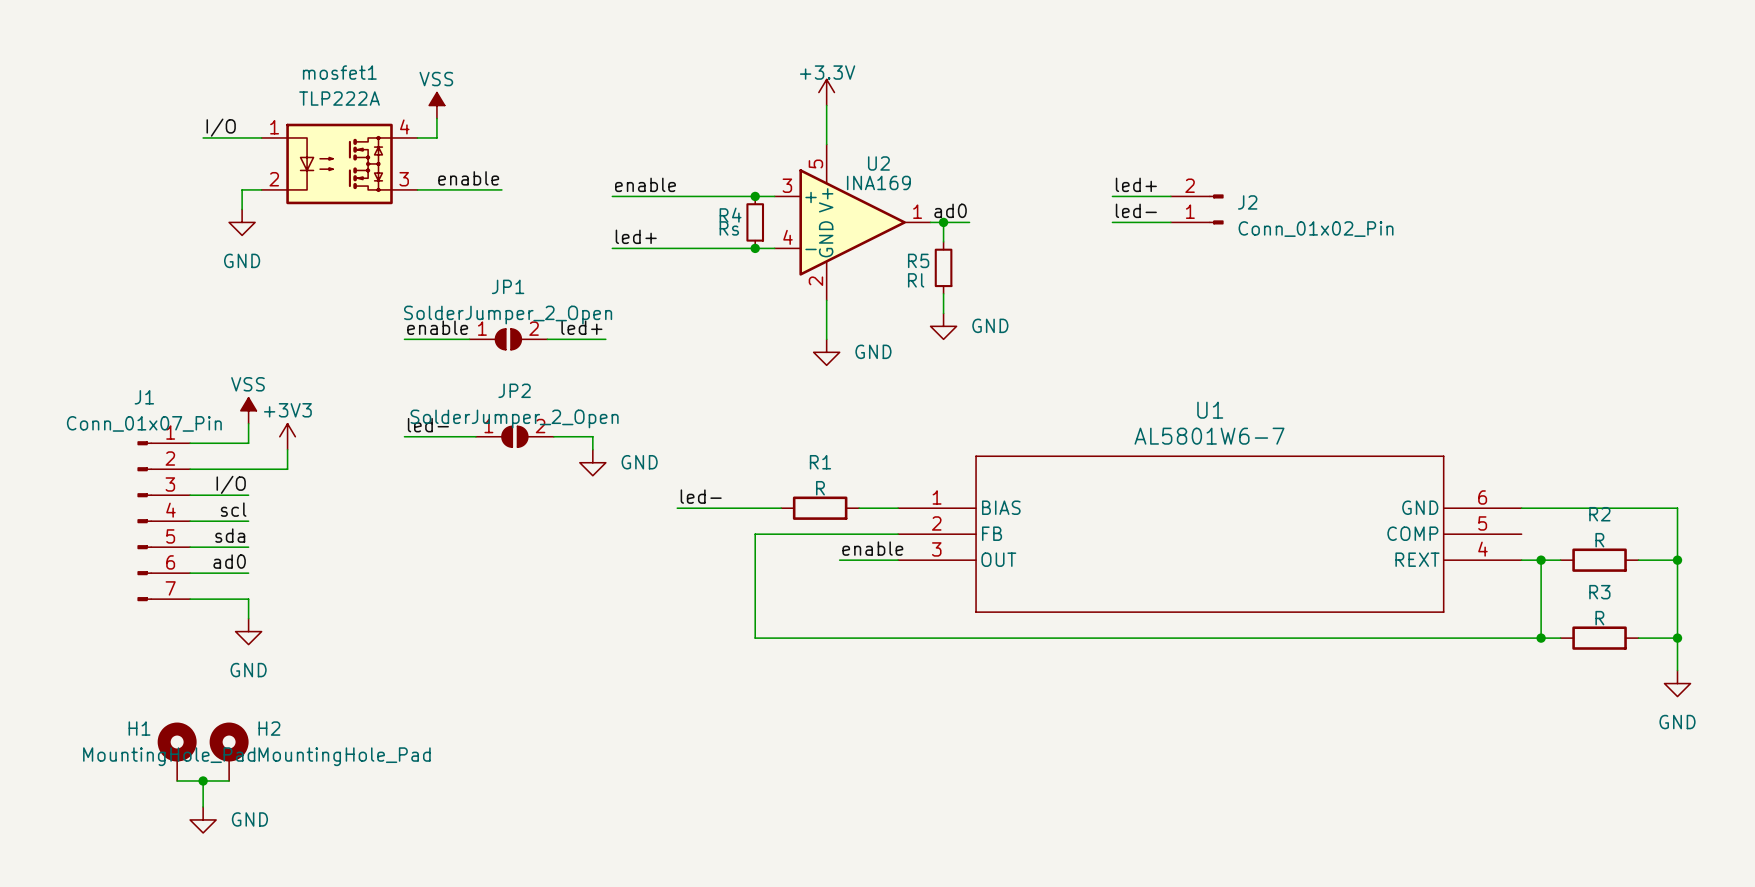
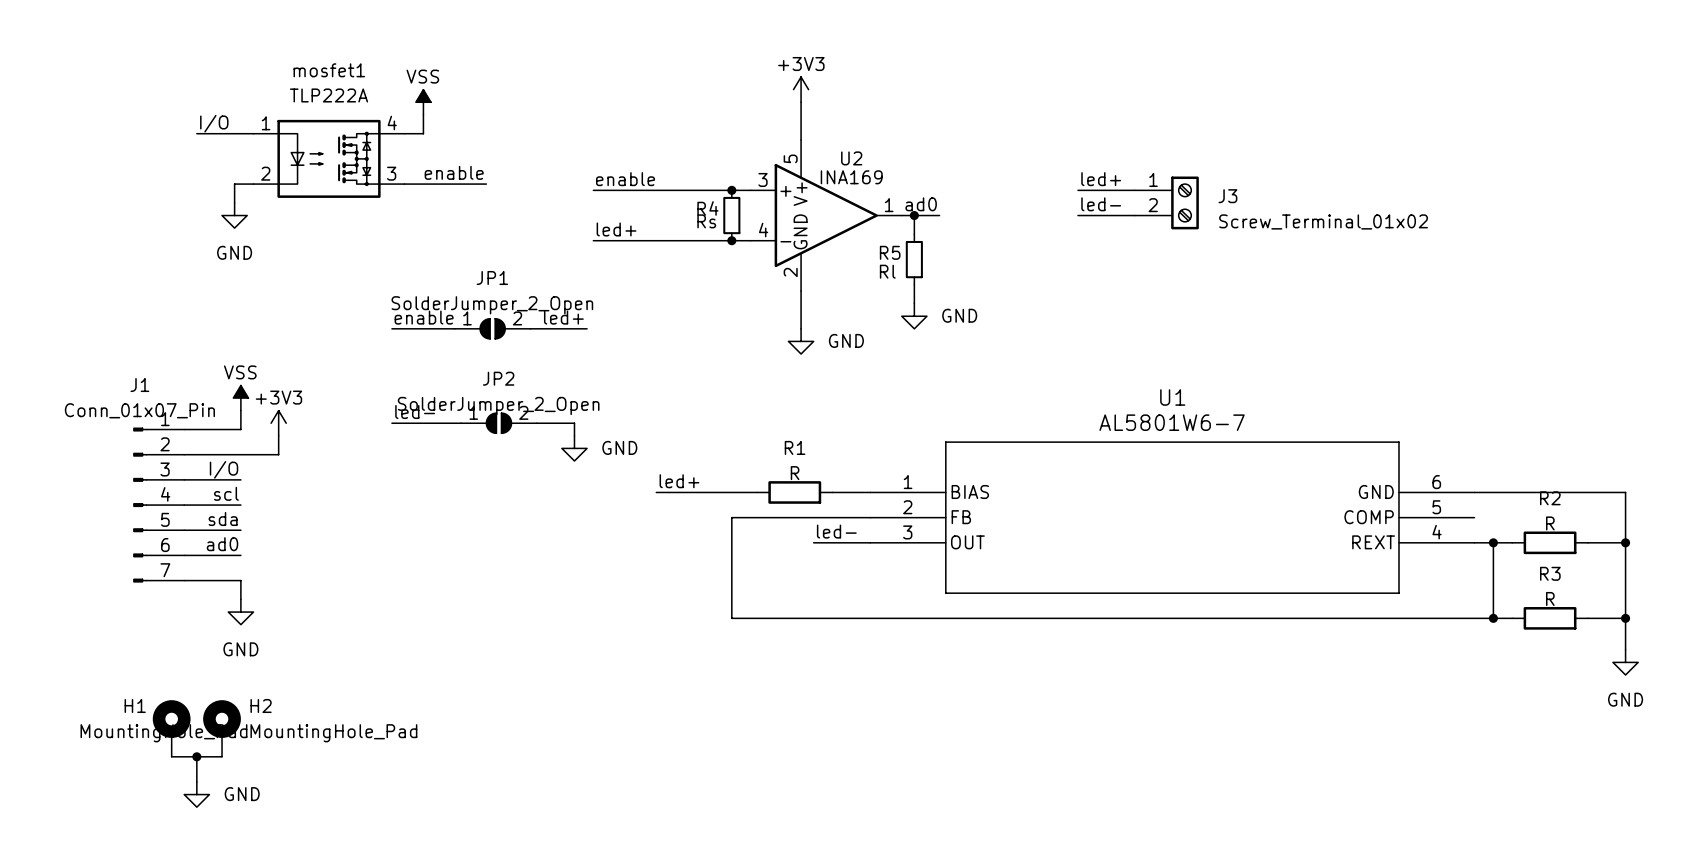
power symbol: +3.3V (826, 92) -> +3V3 (801, 89)
J2: Conn_01x02_Pin (1197, 209) -> none
J3: none -> Screw_Terminal_01x02 (1166, 202)
label: led- (701, 496) -> led+ (679, 481)
label: enable (872, 548) -> led- (836, 531)

